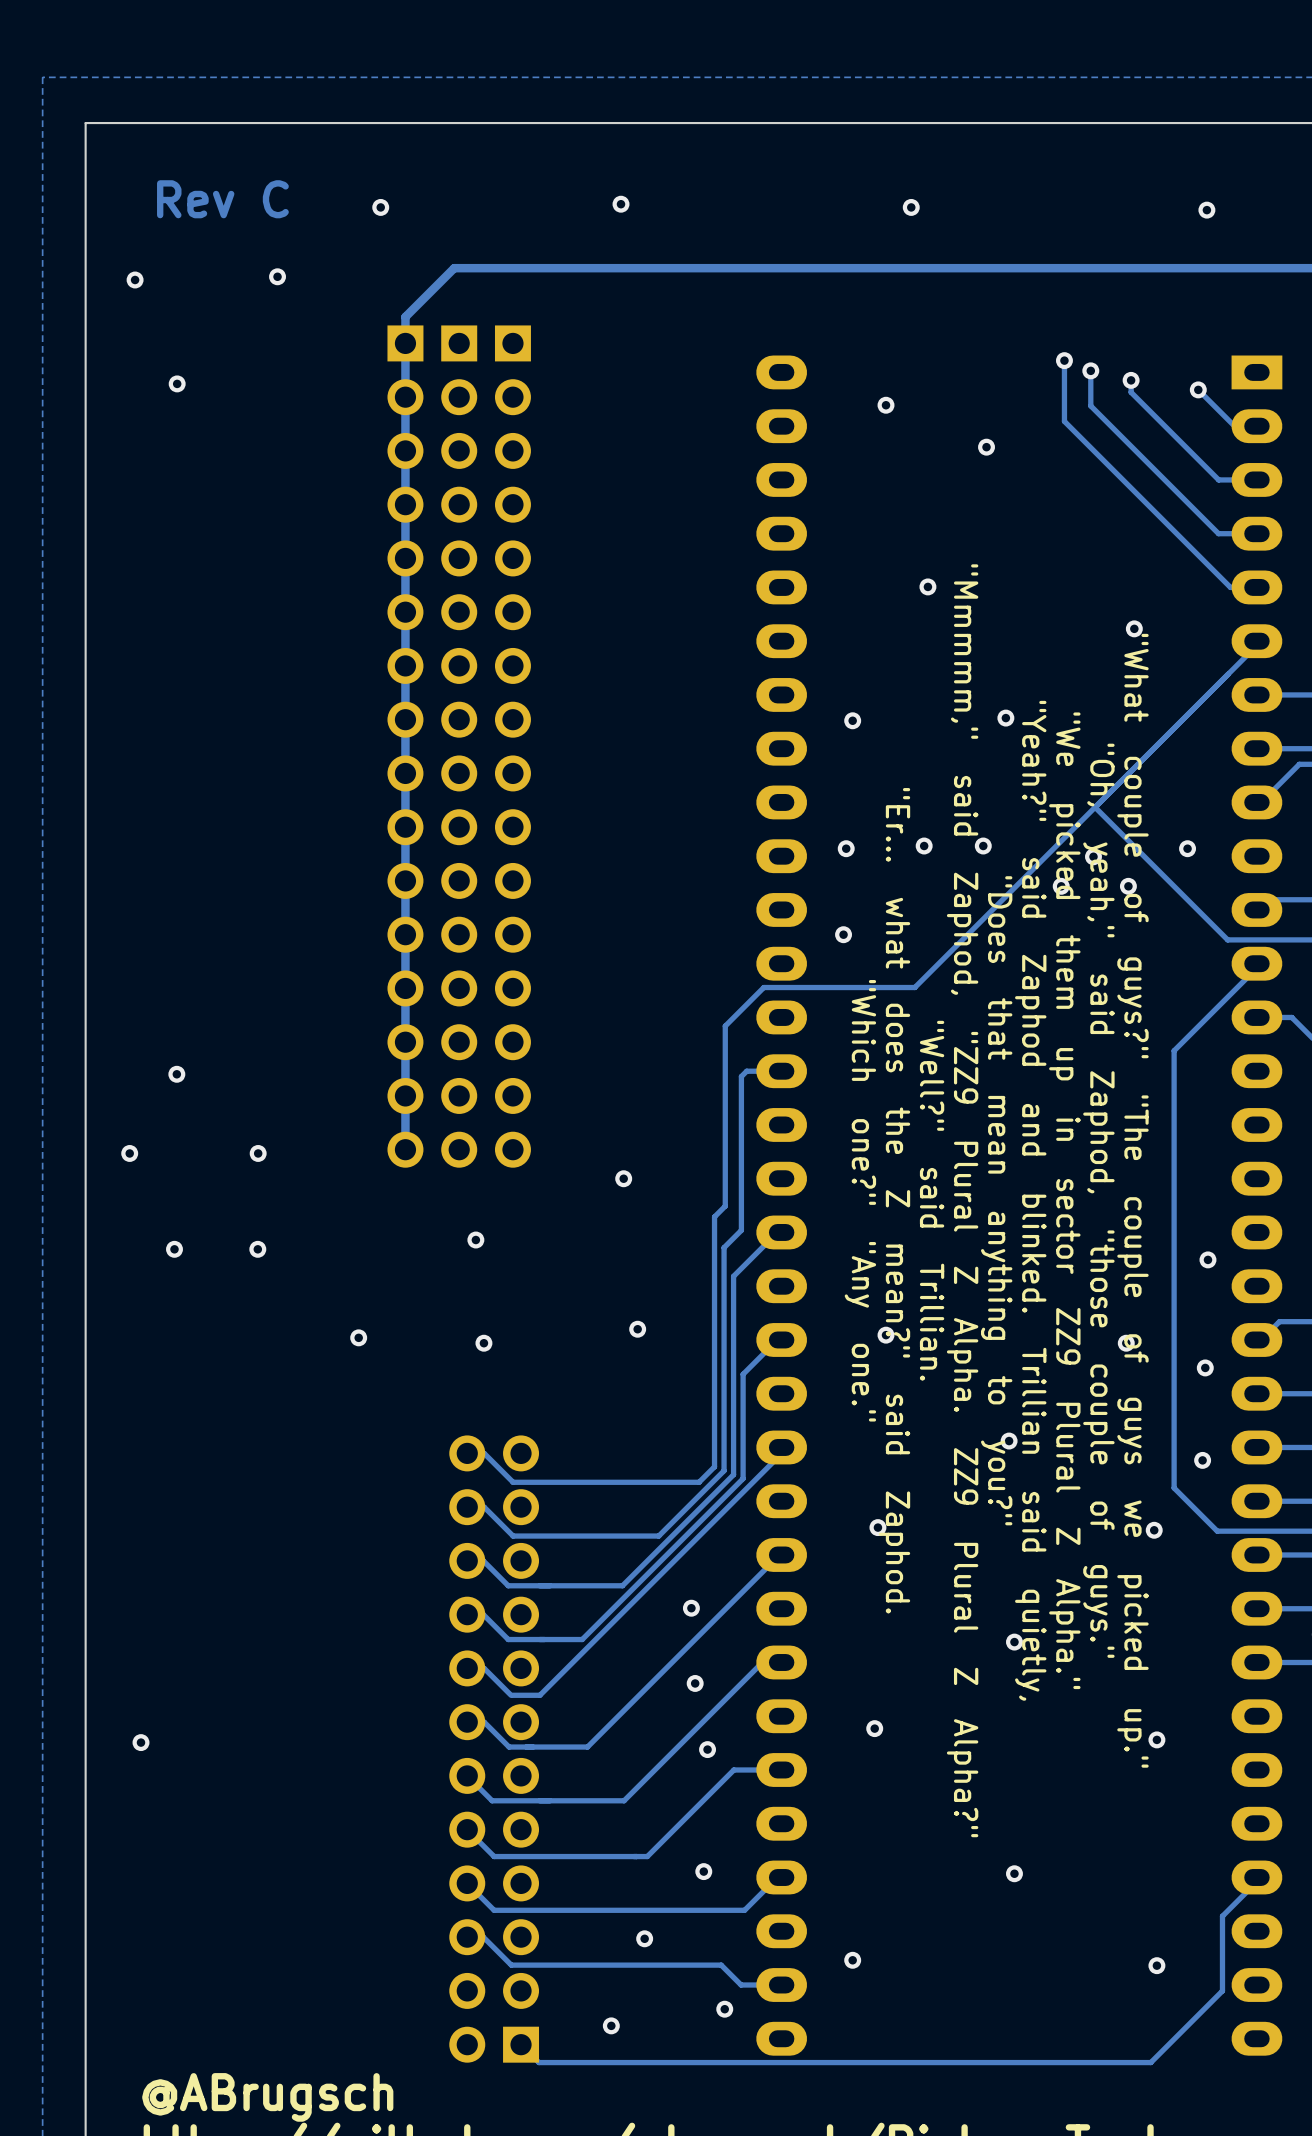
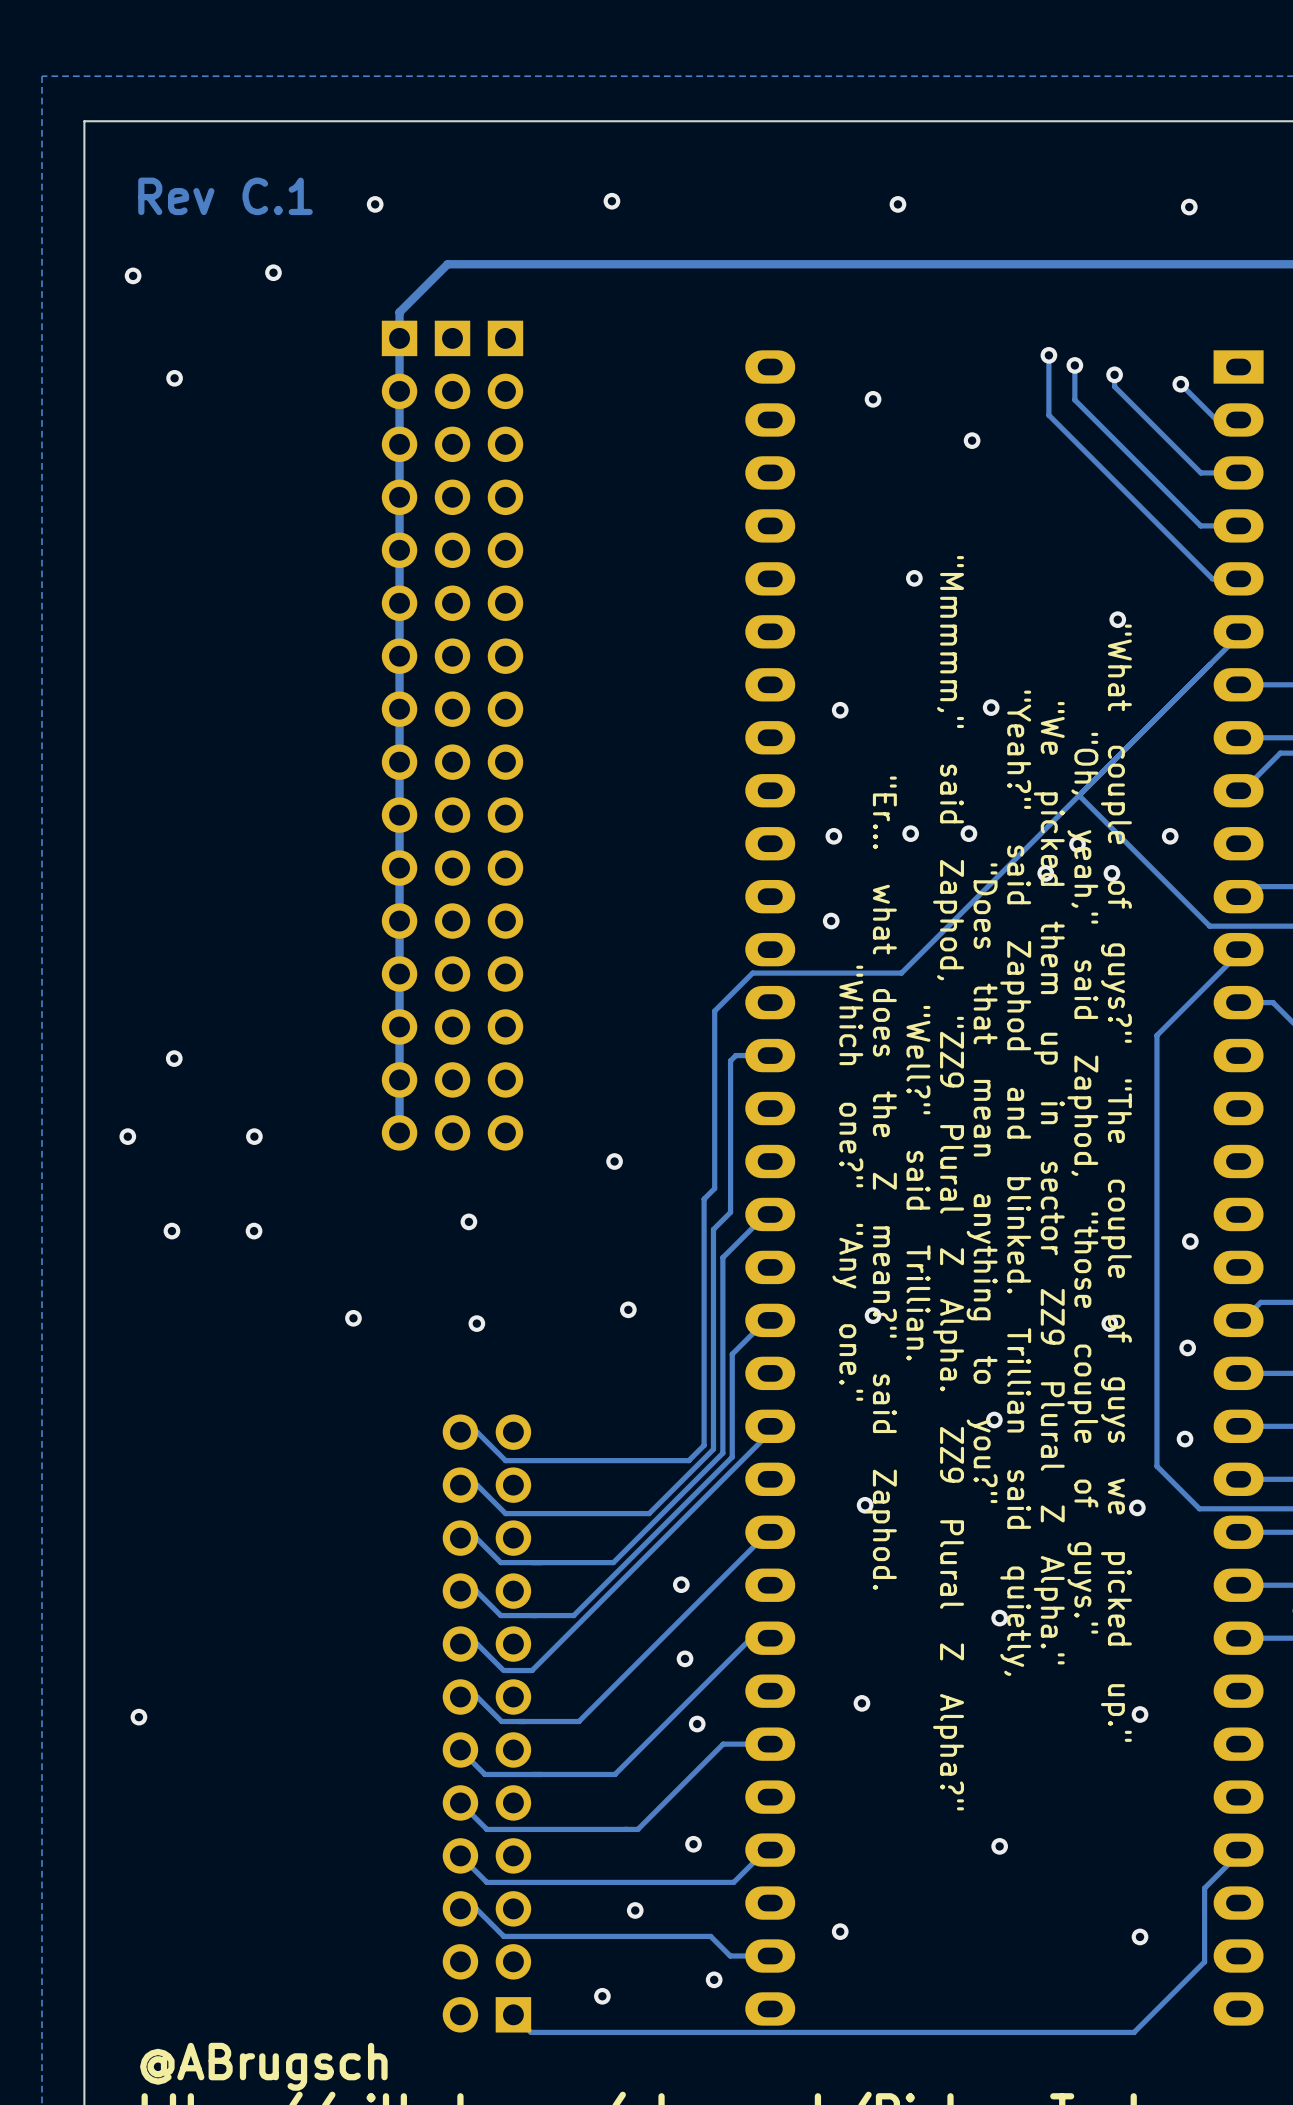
text: Rev C (222, 199) -> Rev C.1 (225, 196)

